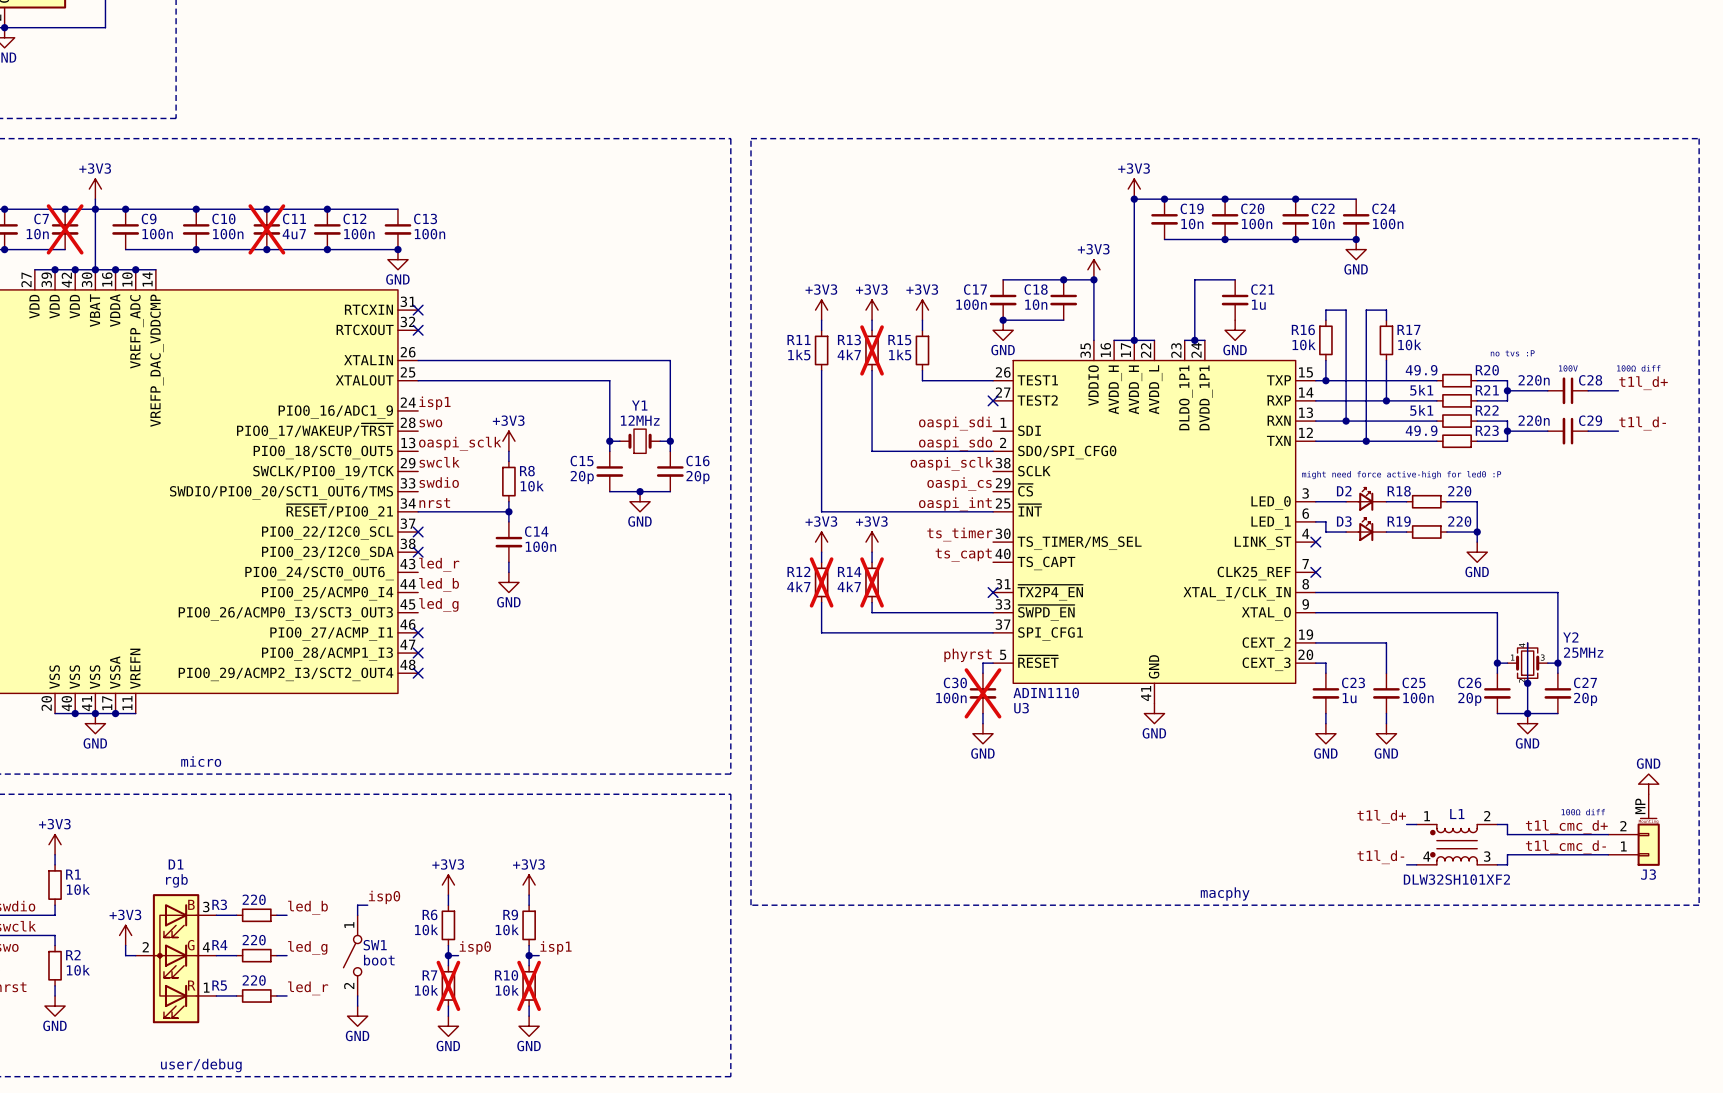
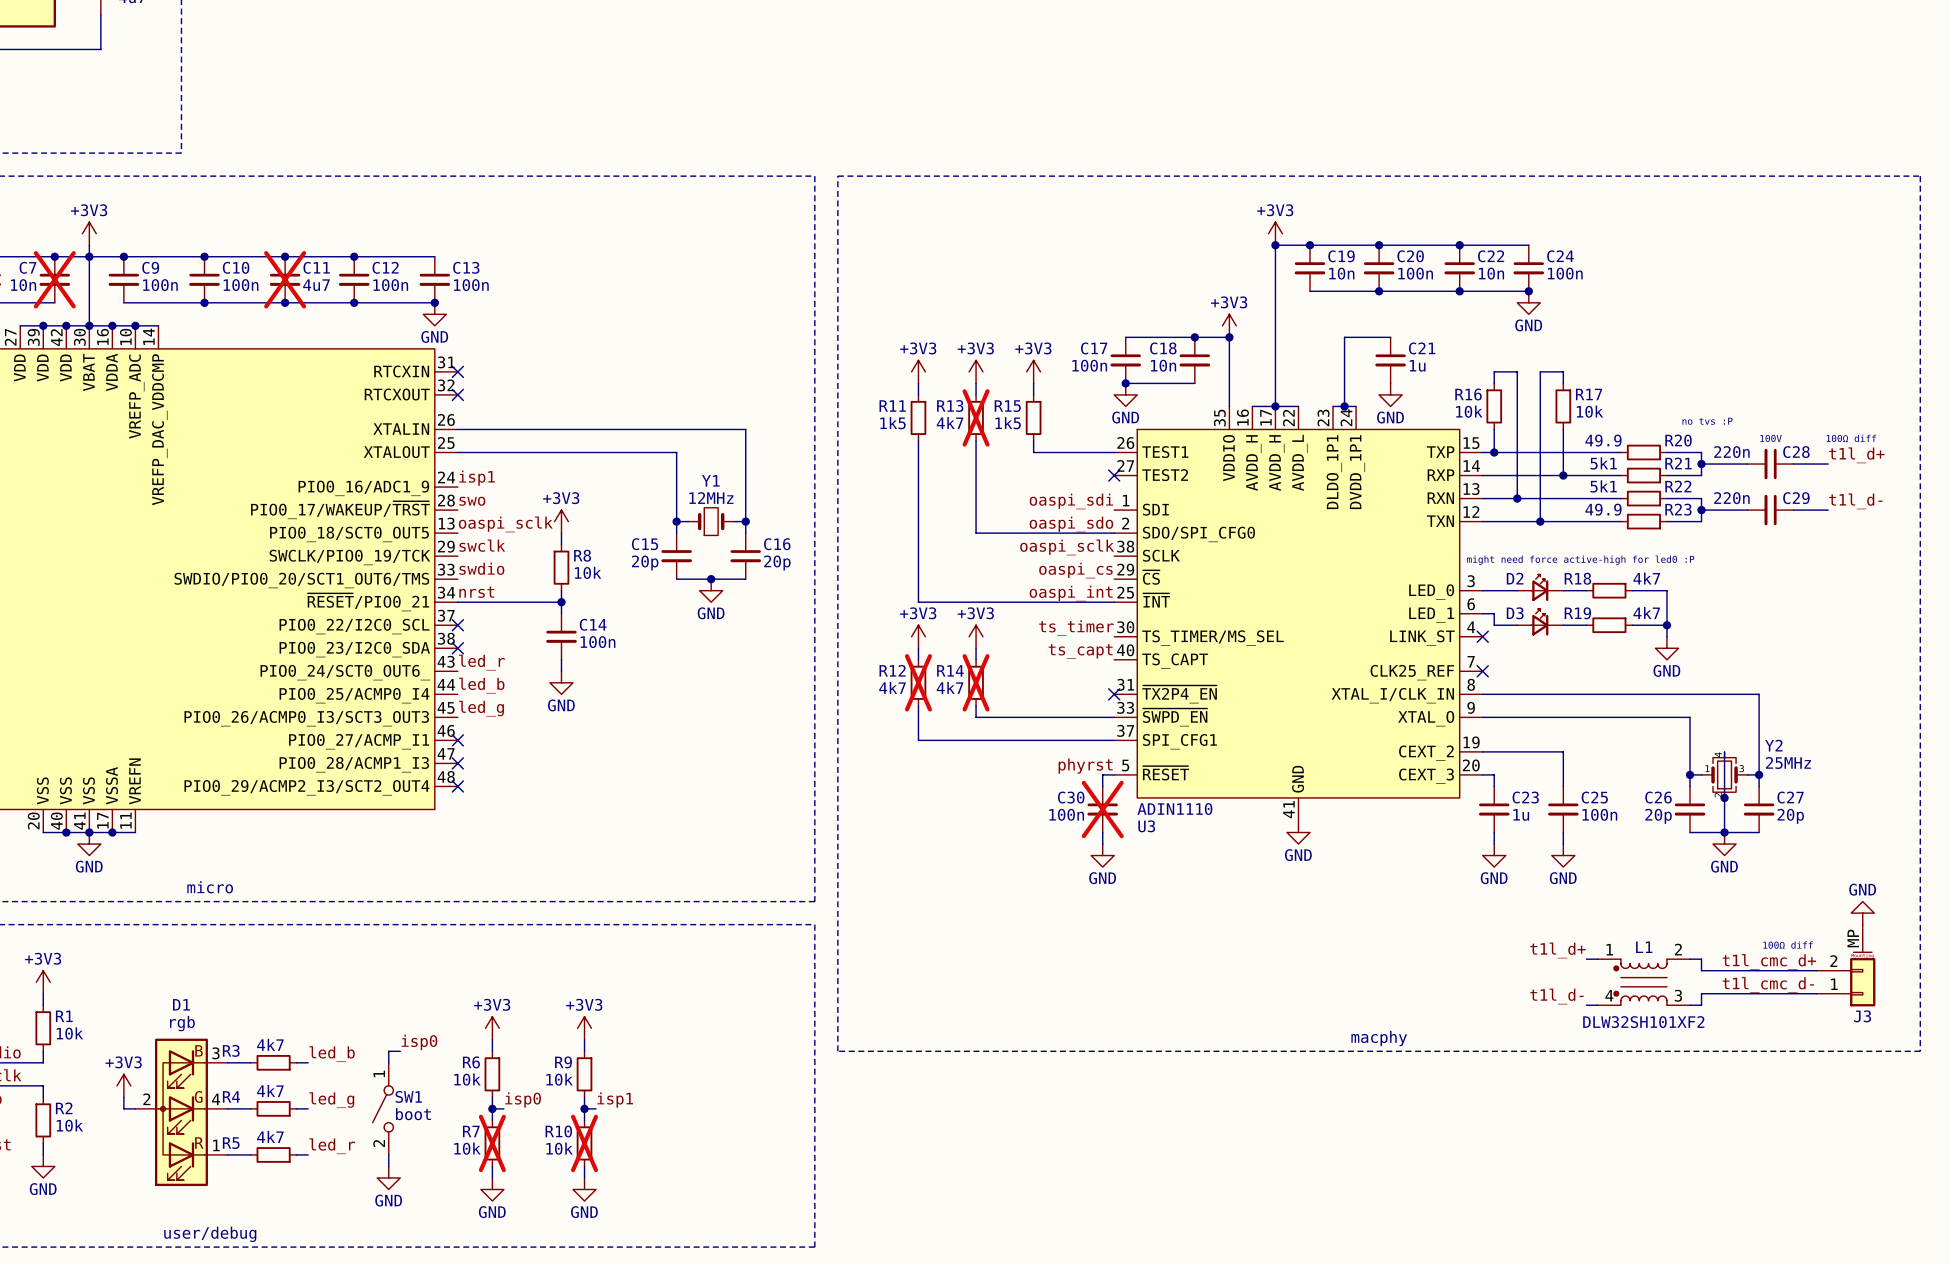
R18 value: 220 (1459, 491) -> 4k7 (1646, 578)
R19 value: 220 (1459, 521) -> 4k7 (1646, 613)
R3 value: 220 (254, 899) -> 4k7 (270, 1044)
R4 value: 220 (254, 940) -> 4k7 (270, 1090)
R5 value: 220 (254, 980) -> 4k7 (270, 1137)

